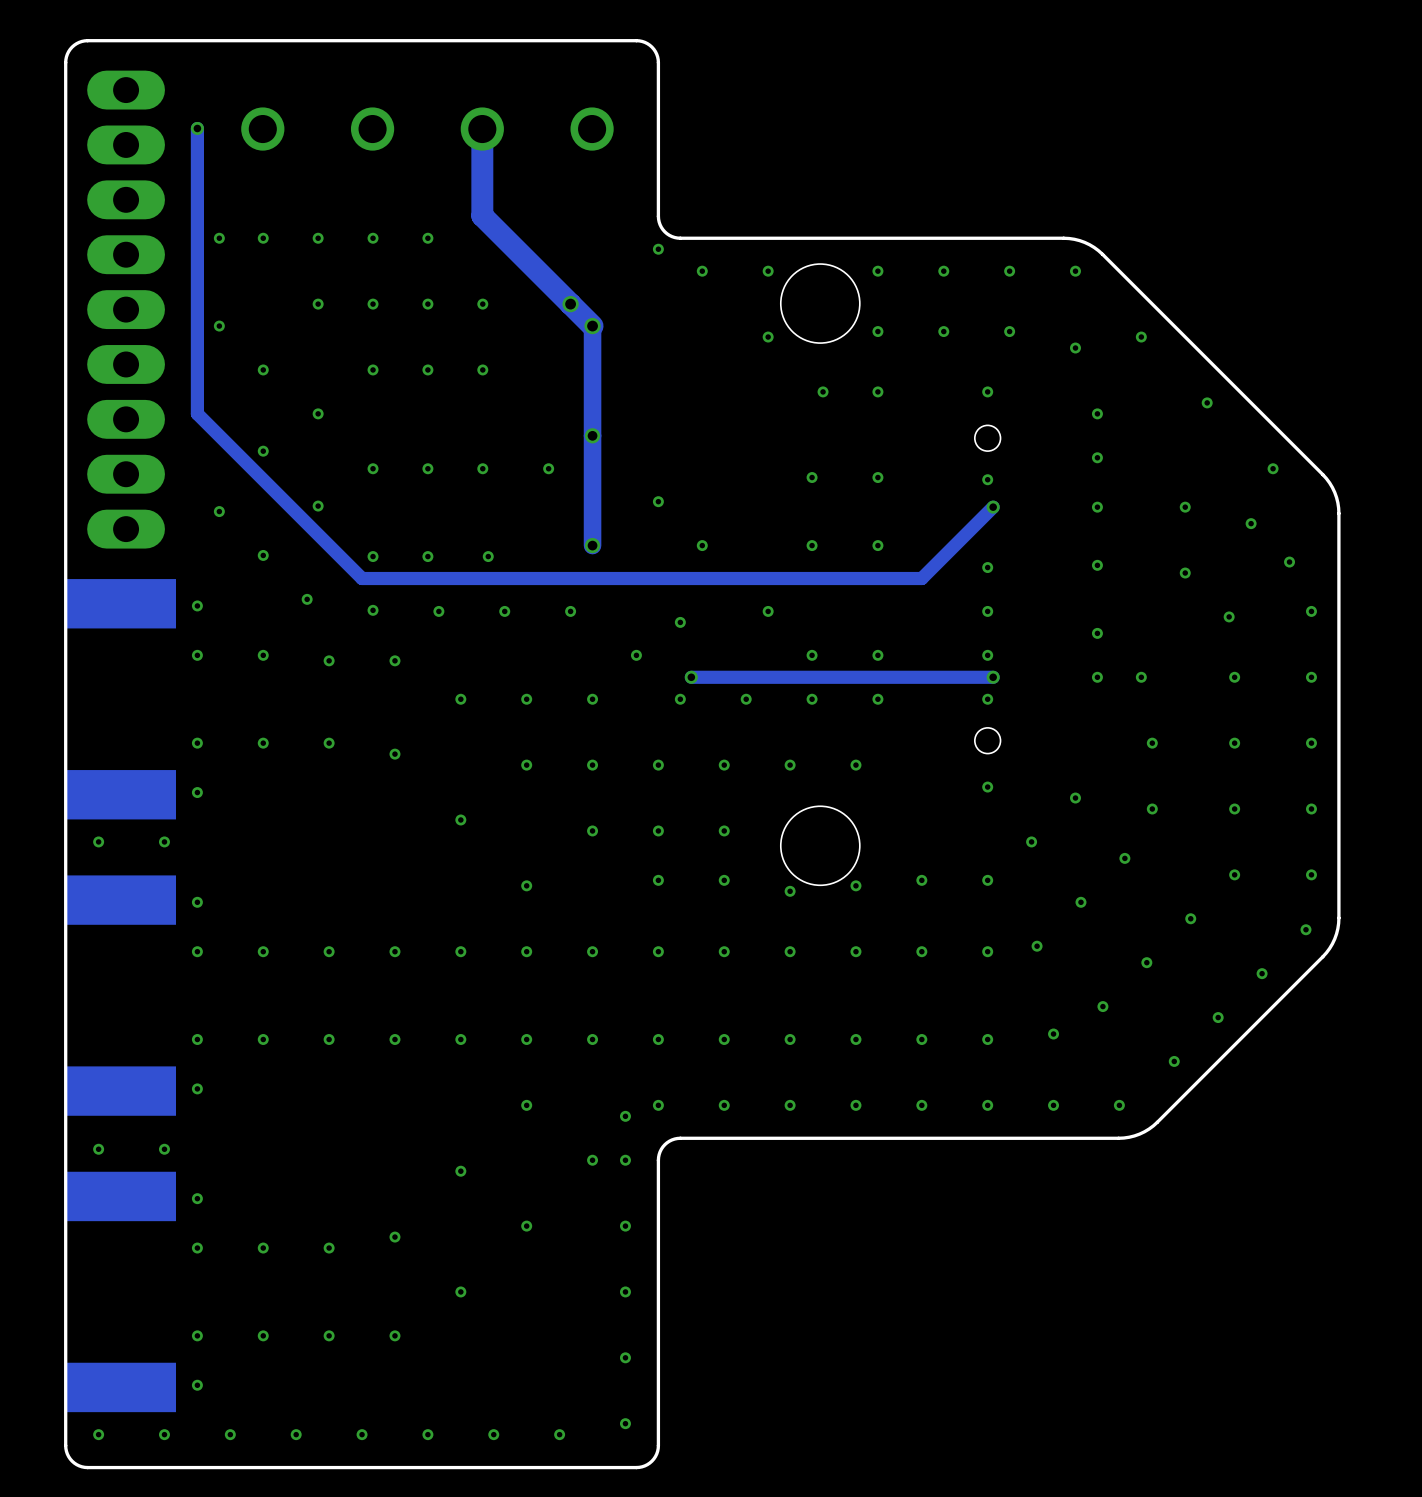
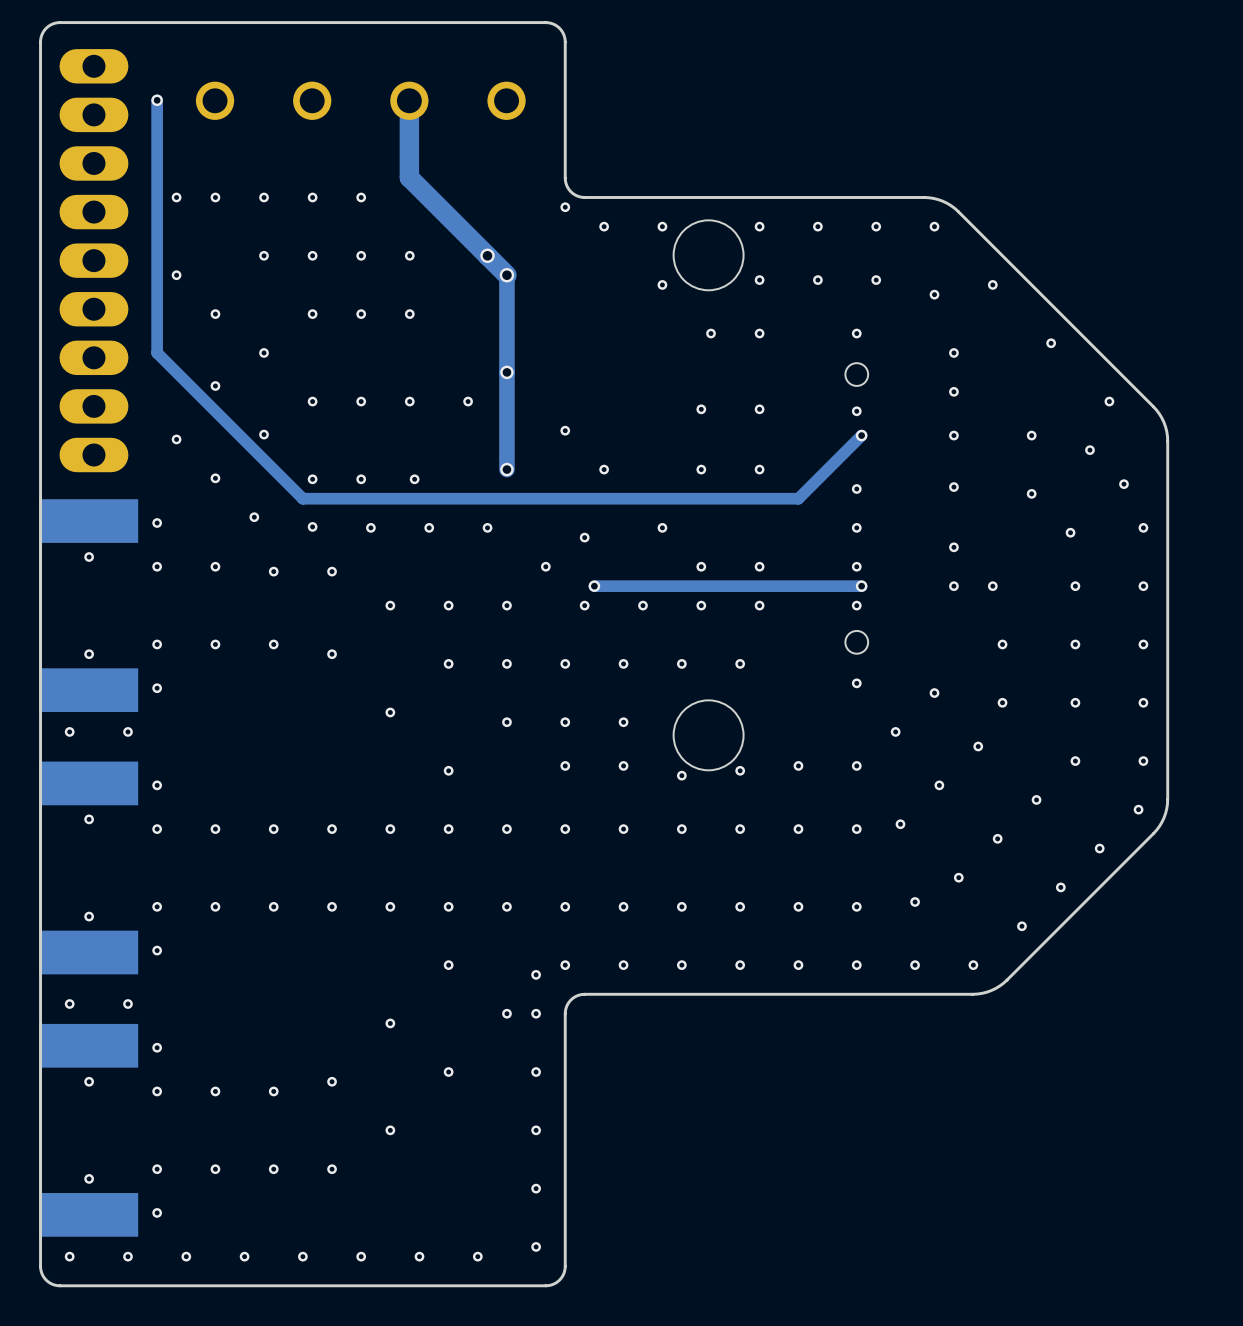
via: none -> (89, 557)
via: none -> (89, 654)
via: none -> (89, 819)
via: none -> (89, 916)
via: none -> (89, 1081)
via: none -> (89, 1178)

